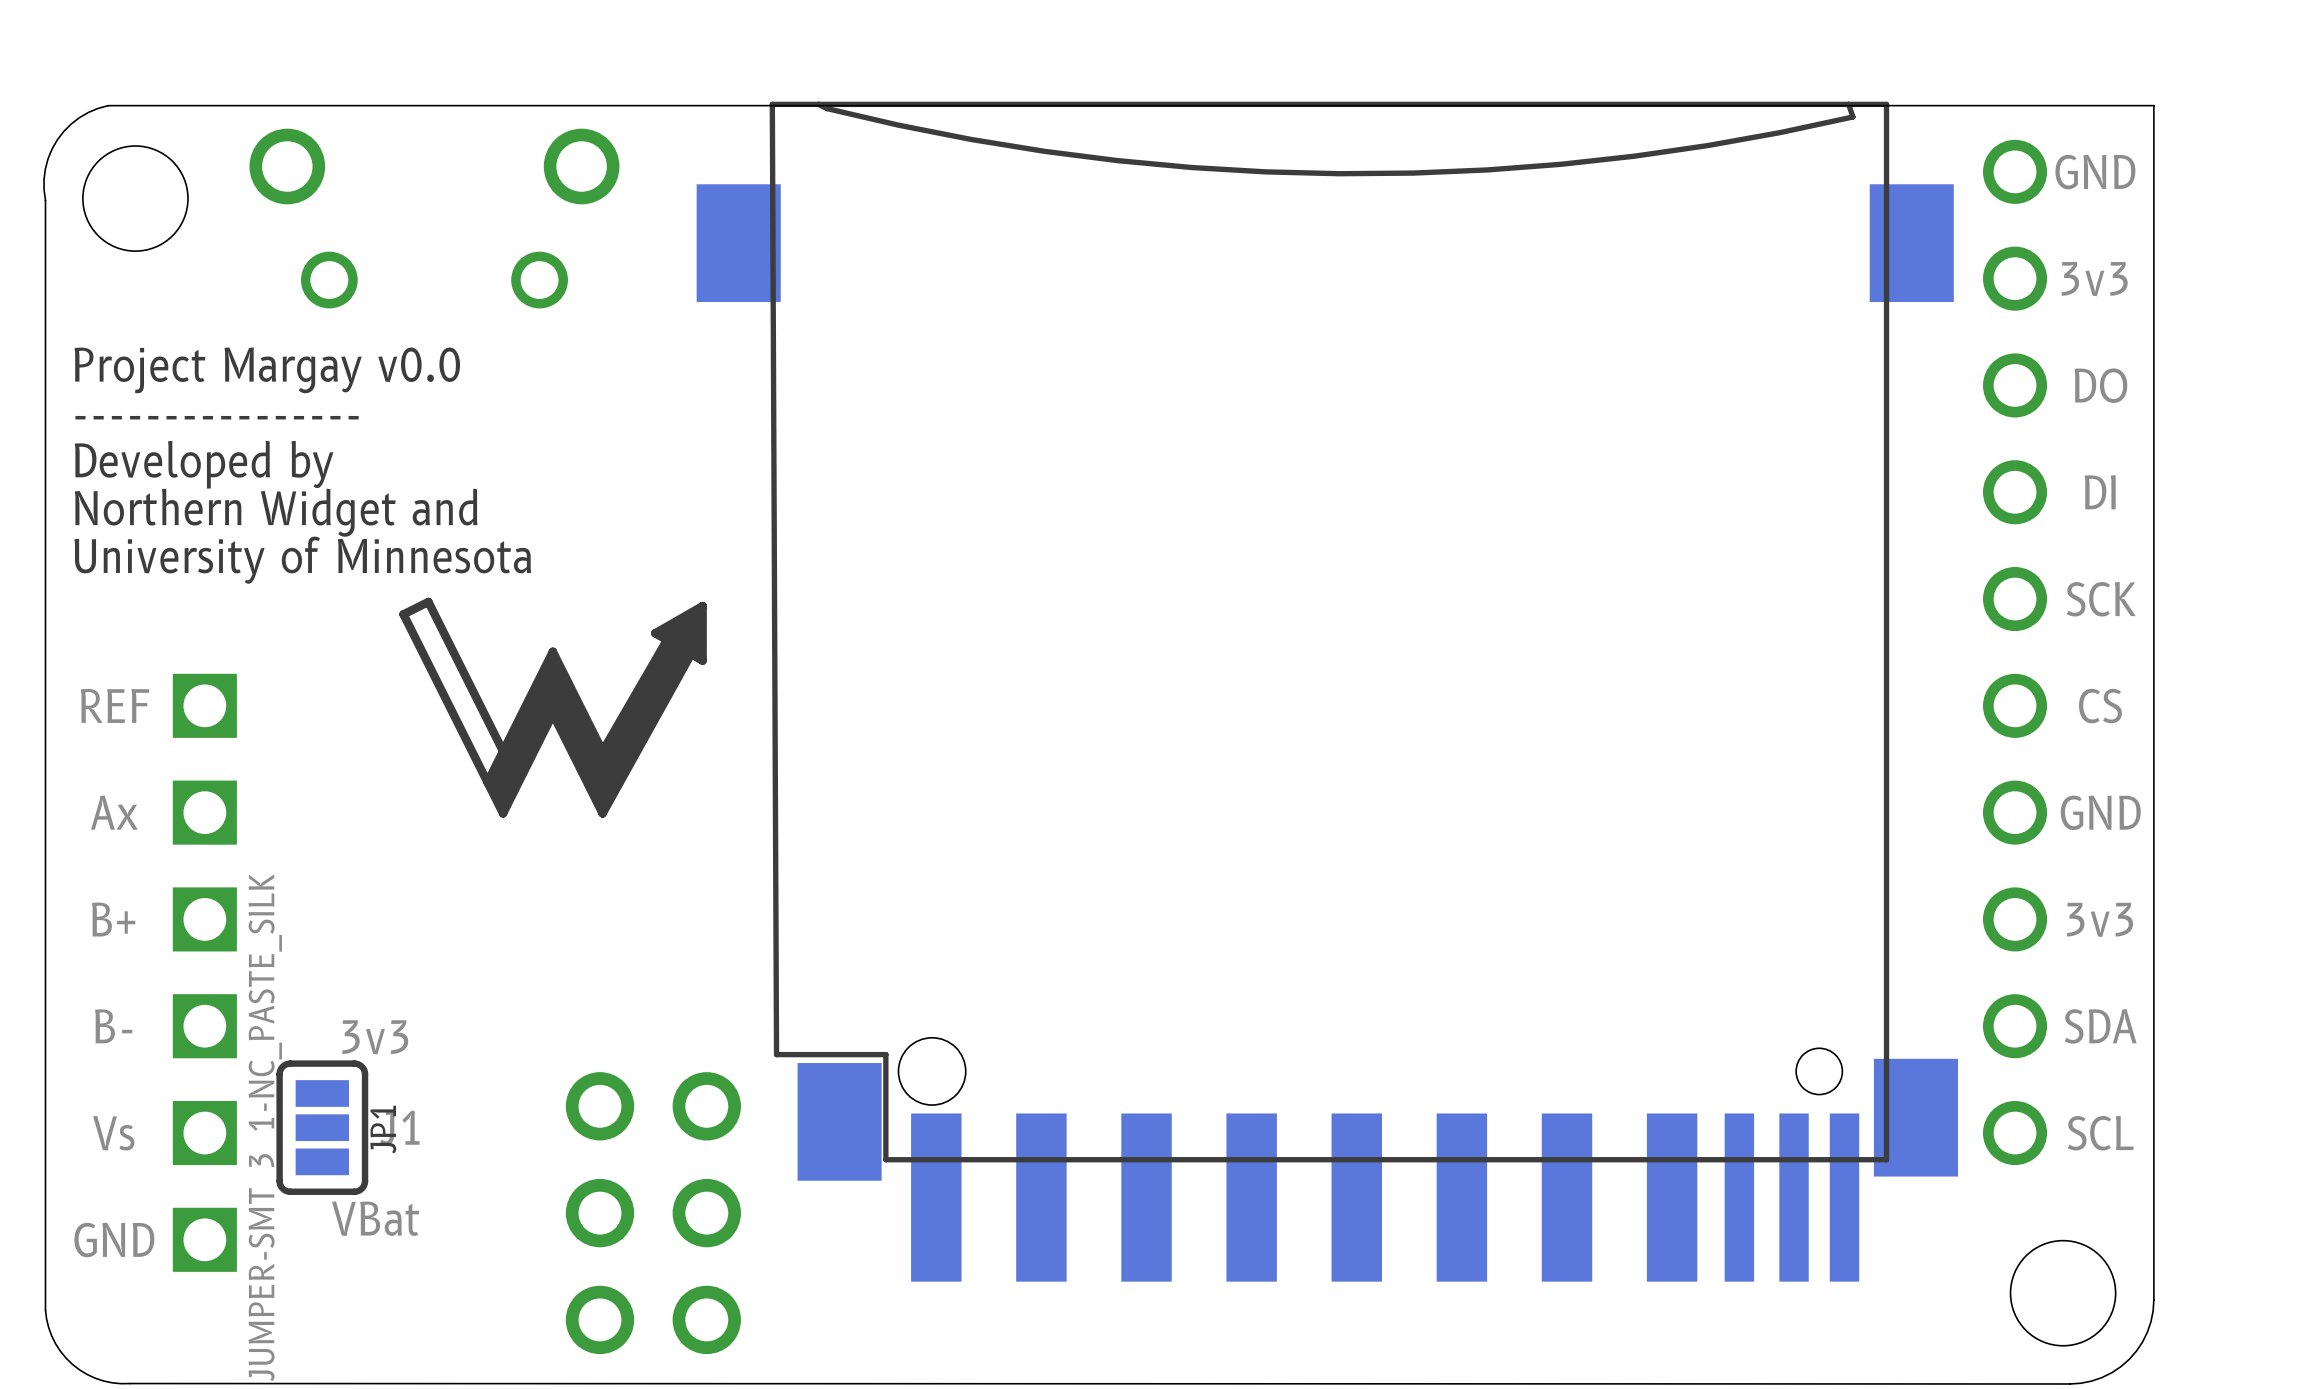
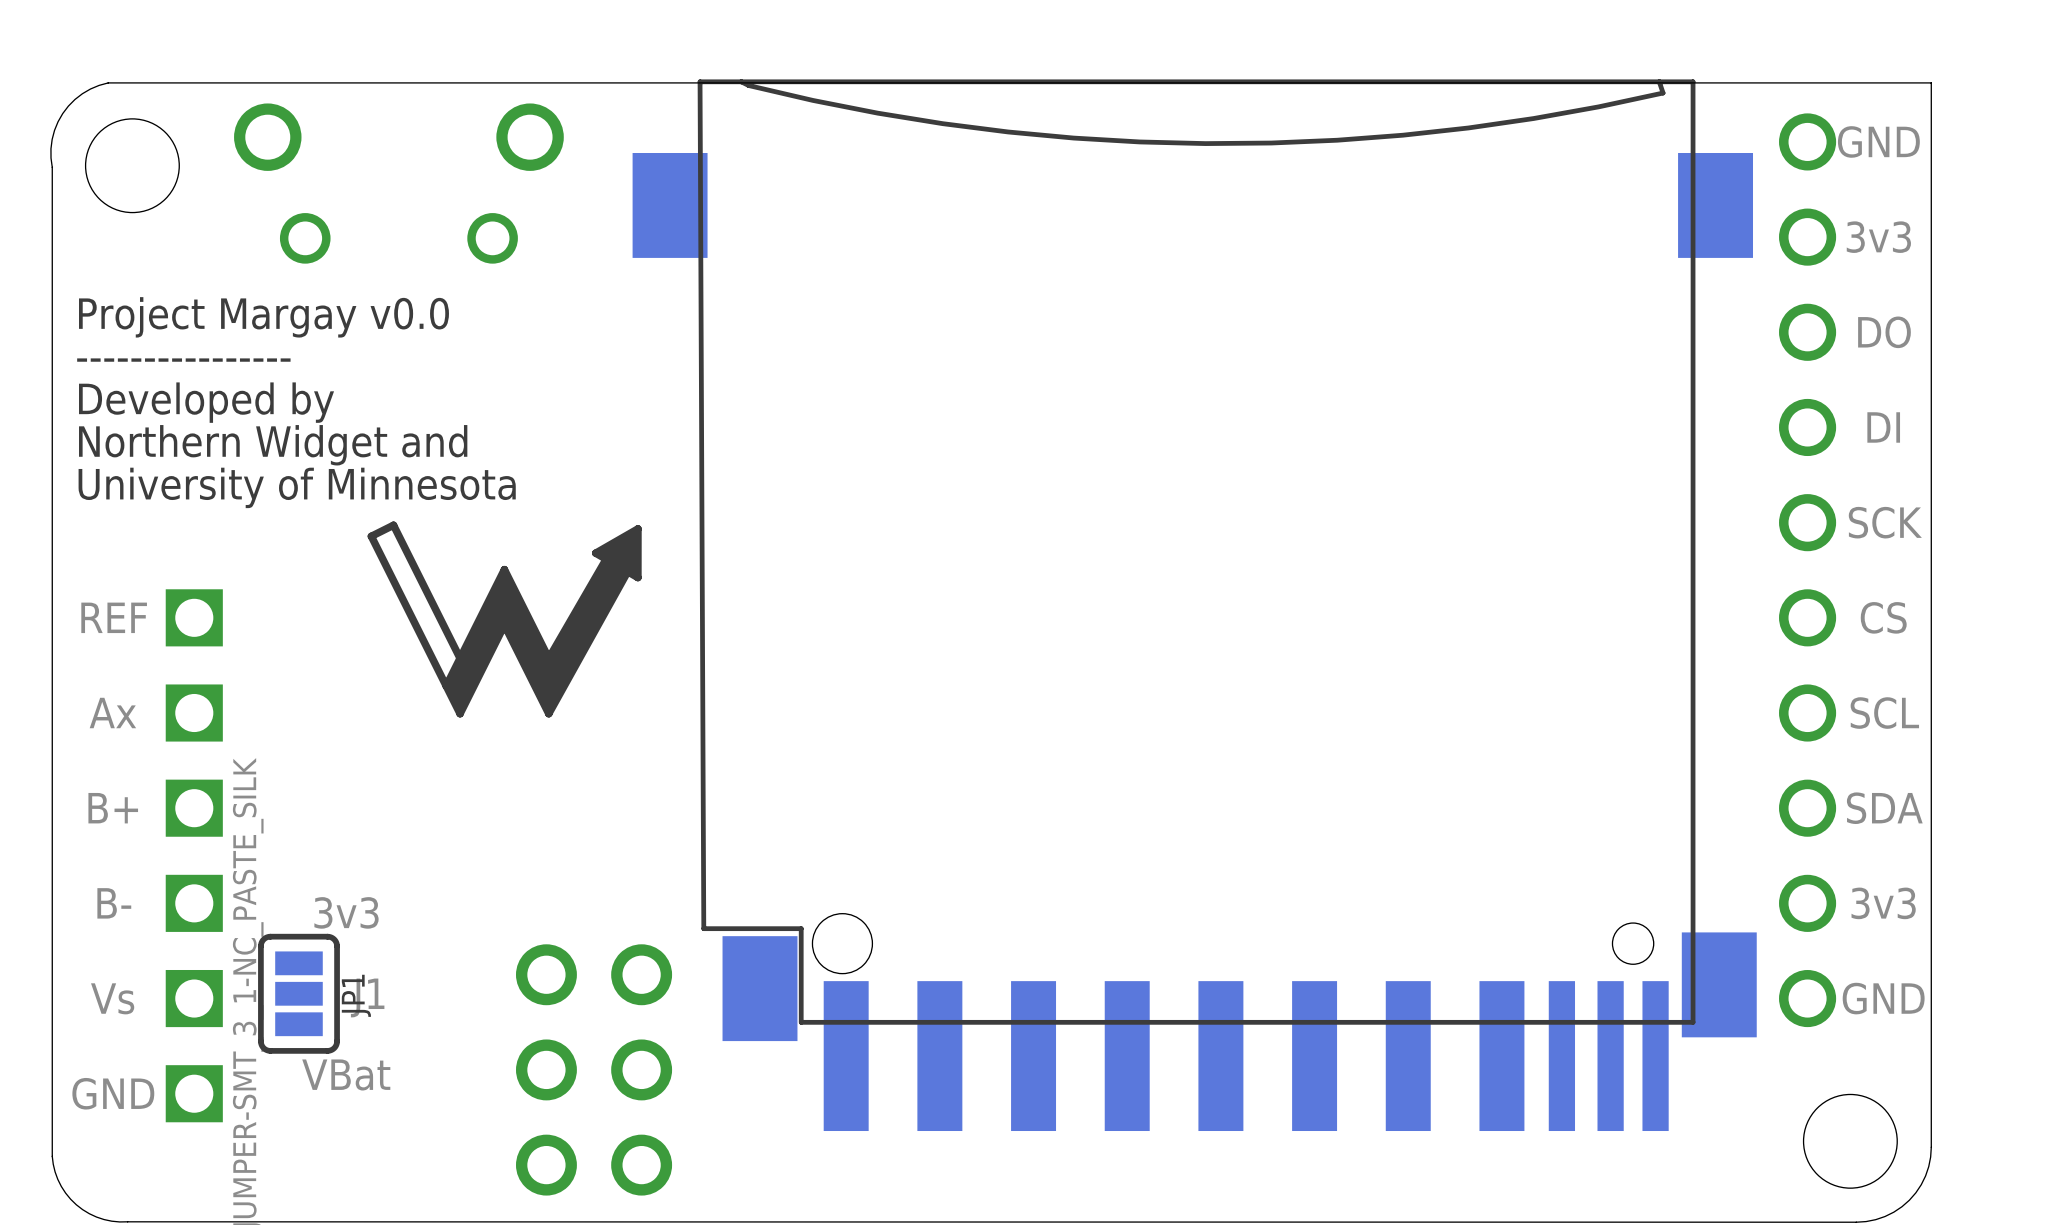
text: GND (2100, 812) -> SCL (1884, 713)
text: 3v3 (2100, 919) -> SDA (1884, 808)
text: SDA (2100, 1026) -> 3v3 (1883, 903)
text: SCL (2100, 1133) -> GND (1883, 998)

